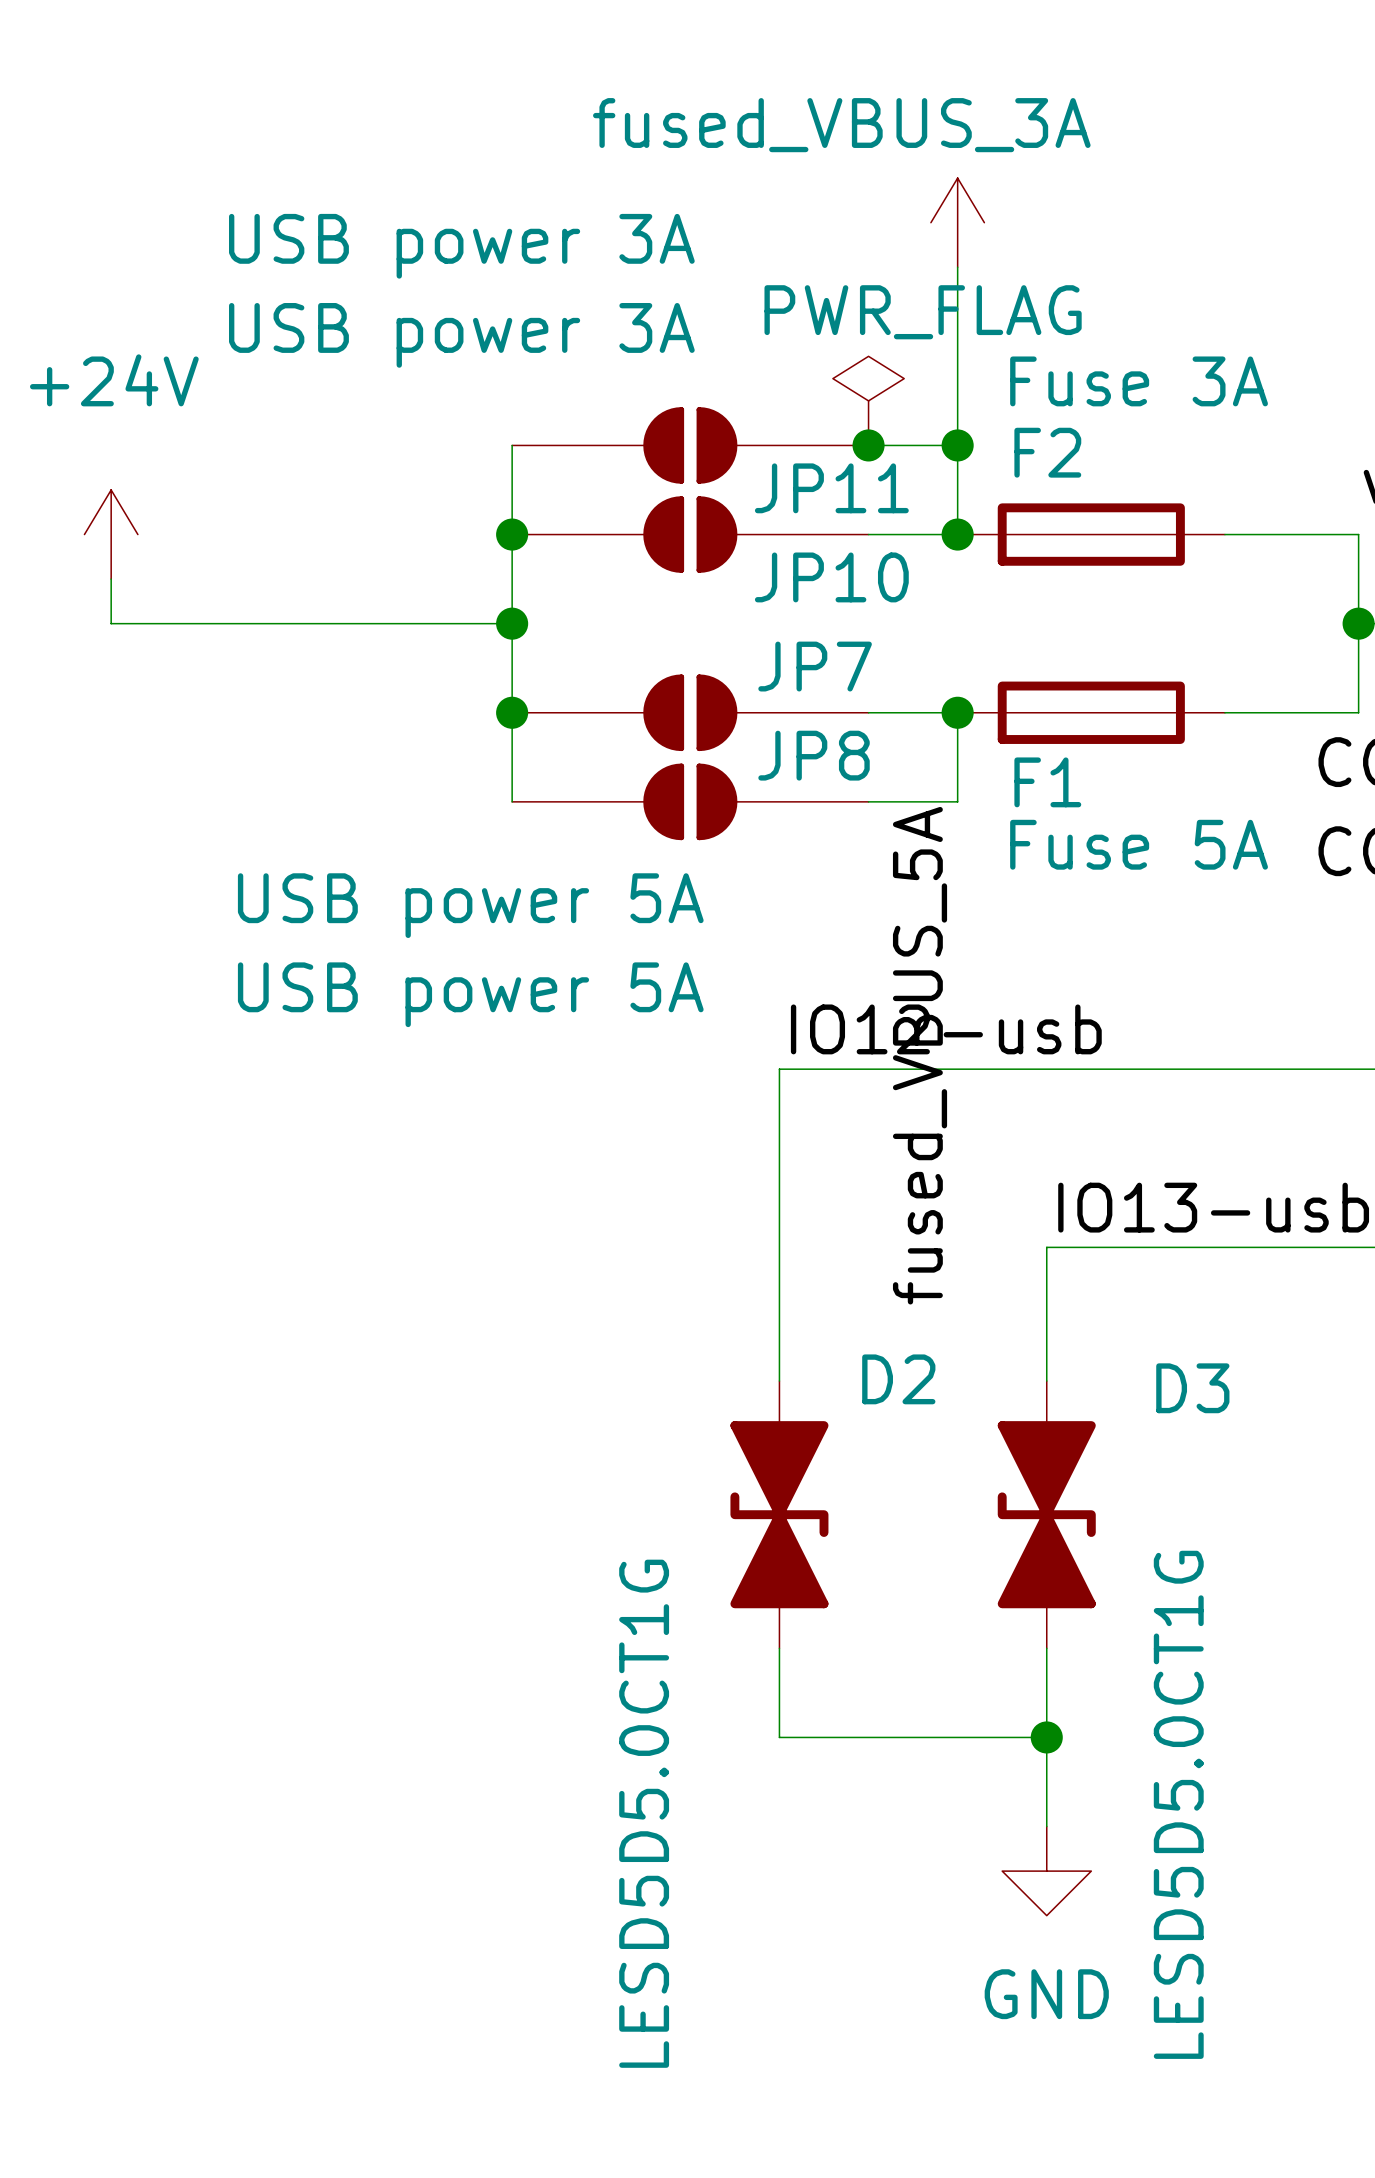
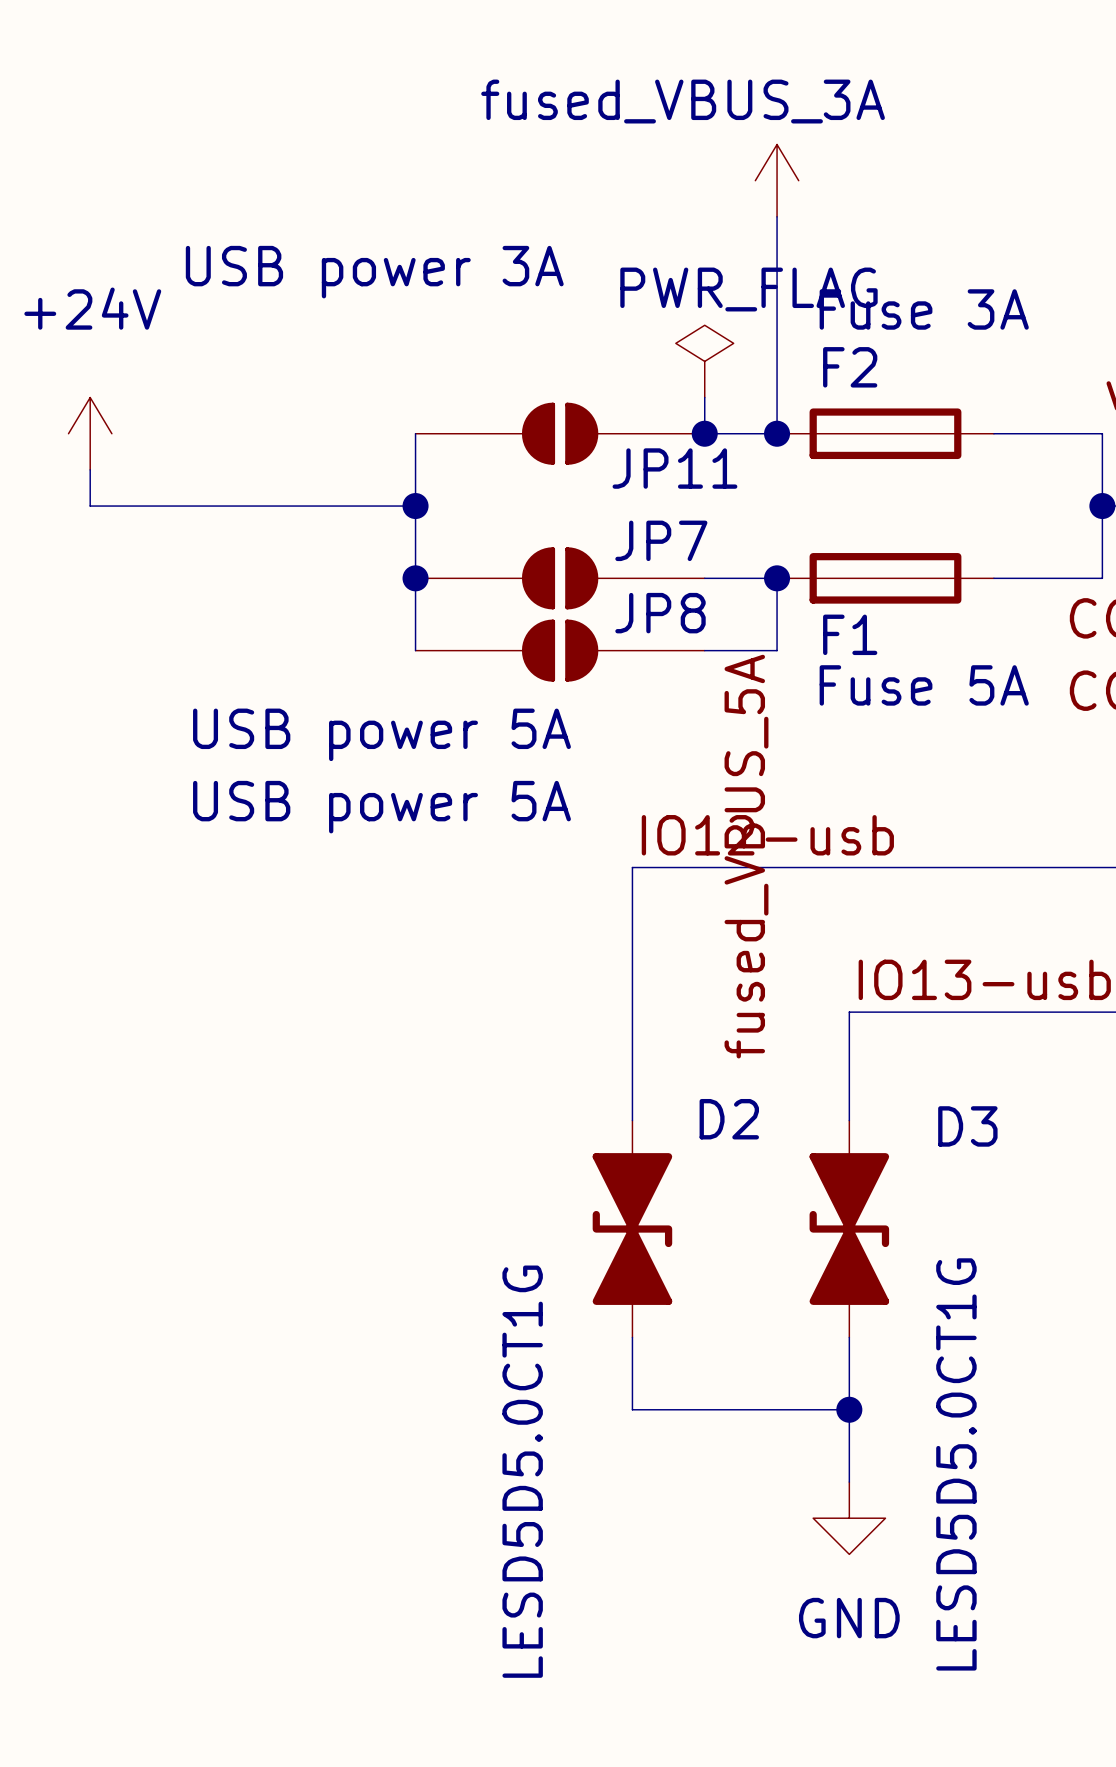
power symbol position: PWR_FLAG (868, 400) -> PWR_FLAG (704, 361)
wire: (512, 445) (512, 534) -> none
JP11: USB power 3A (690, 445) -> none
wire: (868, 445) (957, 445) -> none
junction: (868, 445) -> none
junction: (957, 445) -> none
wire: none -> (704, 397) (704, 433)
junction: (512, 534) -> none
junction: none -> (704, 433)
JP10 name: JP10 (831, 577) -> JP11 (674, 468)

